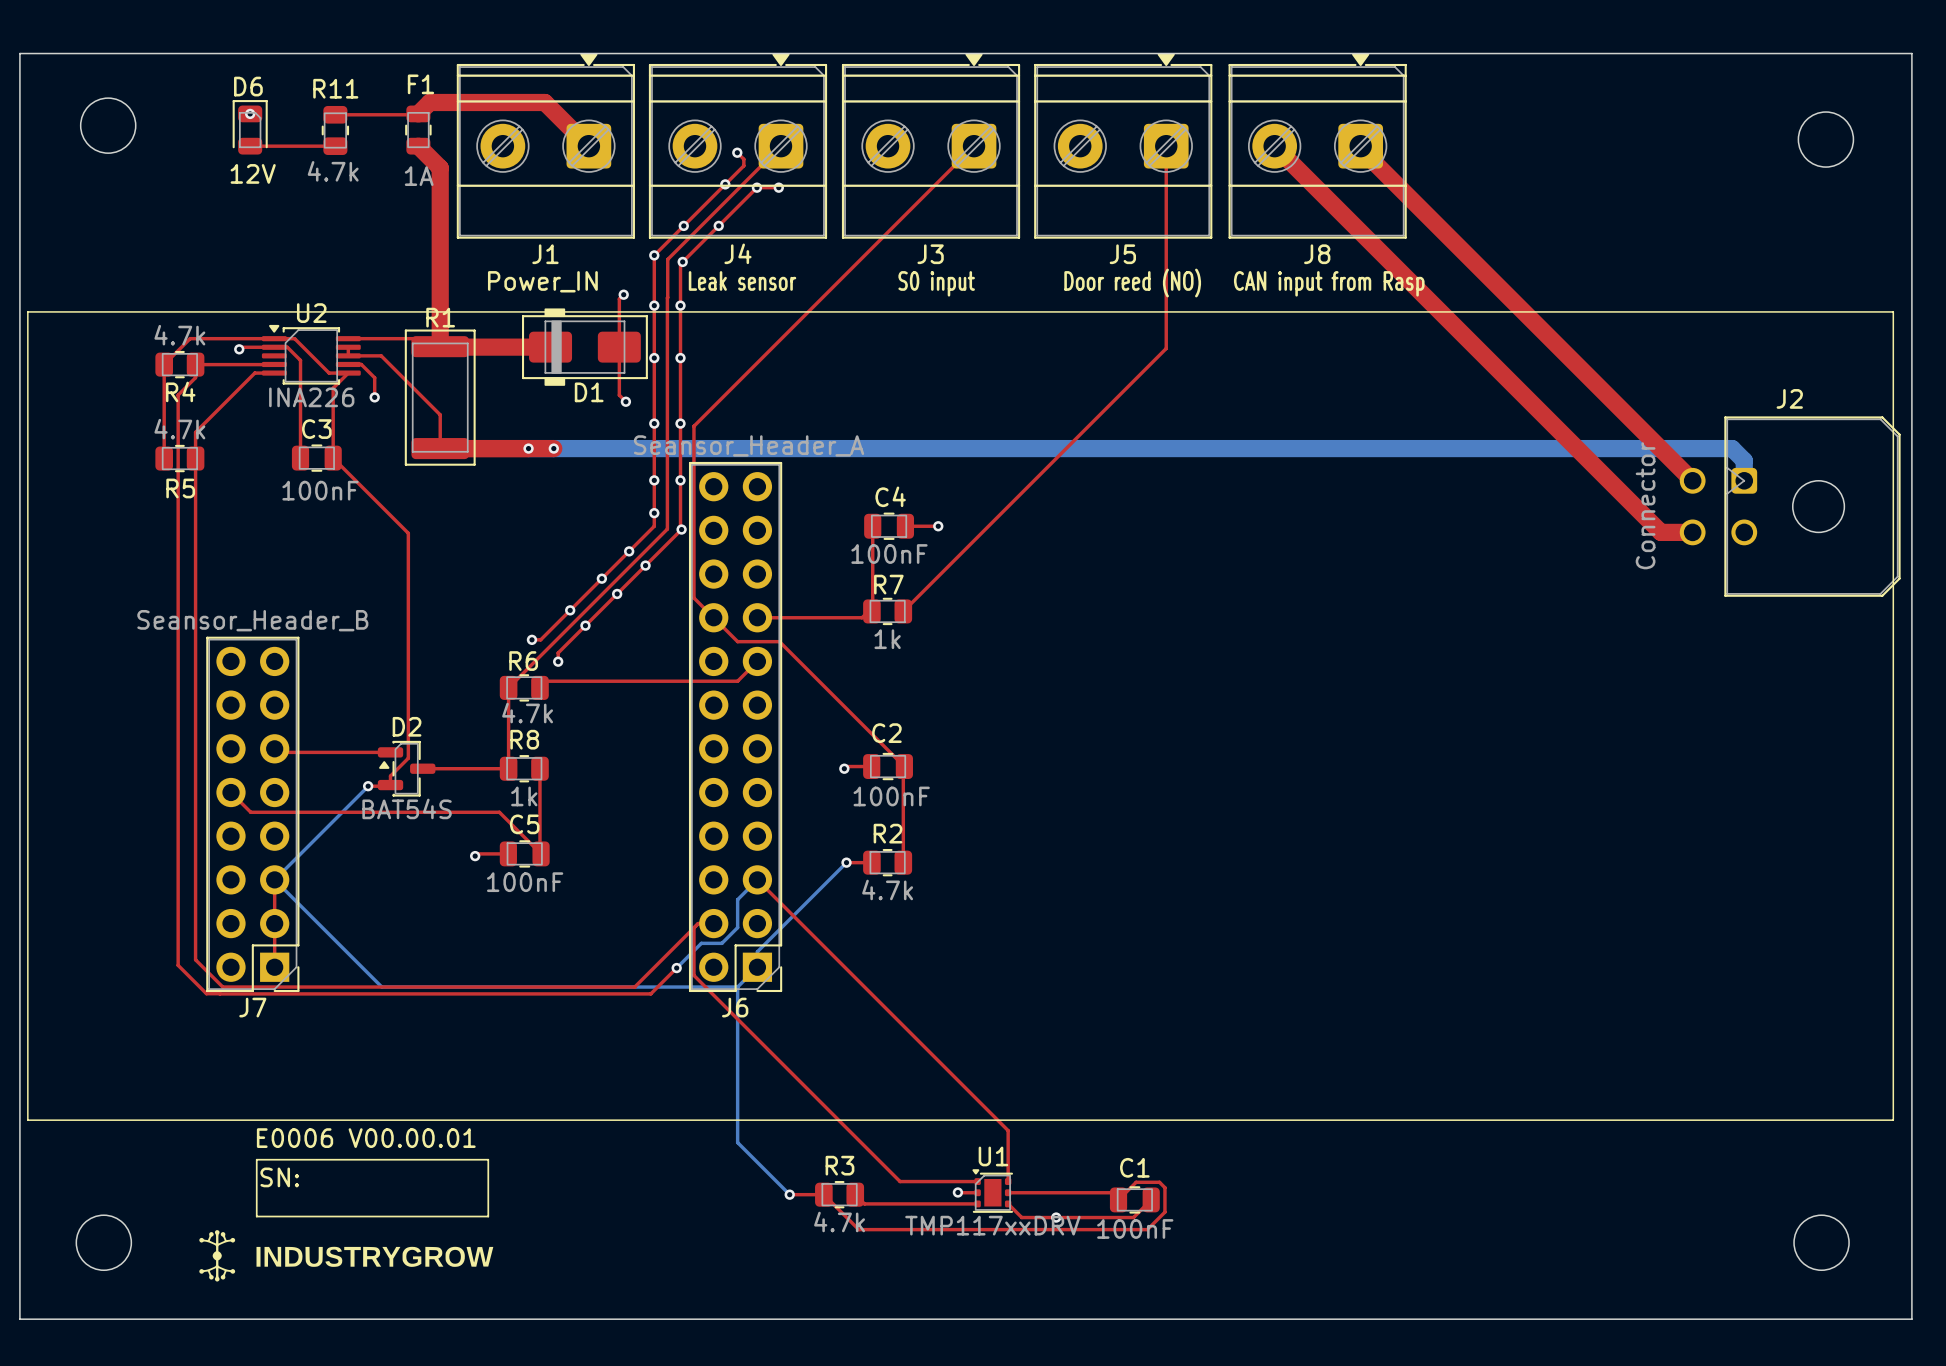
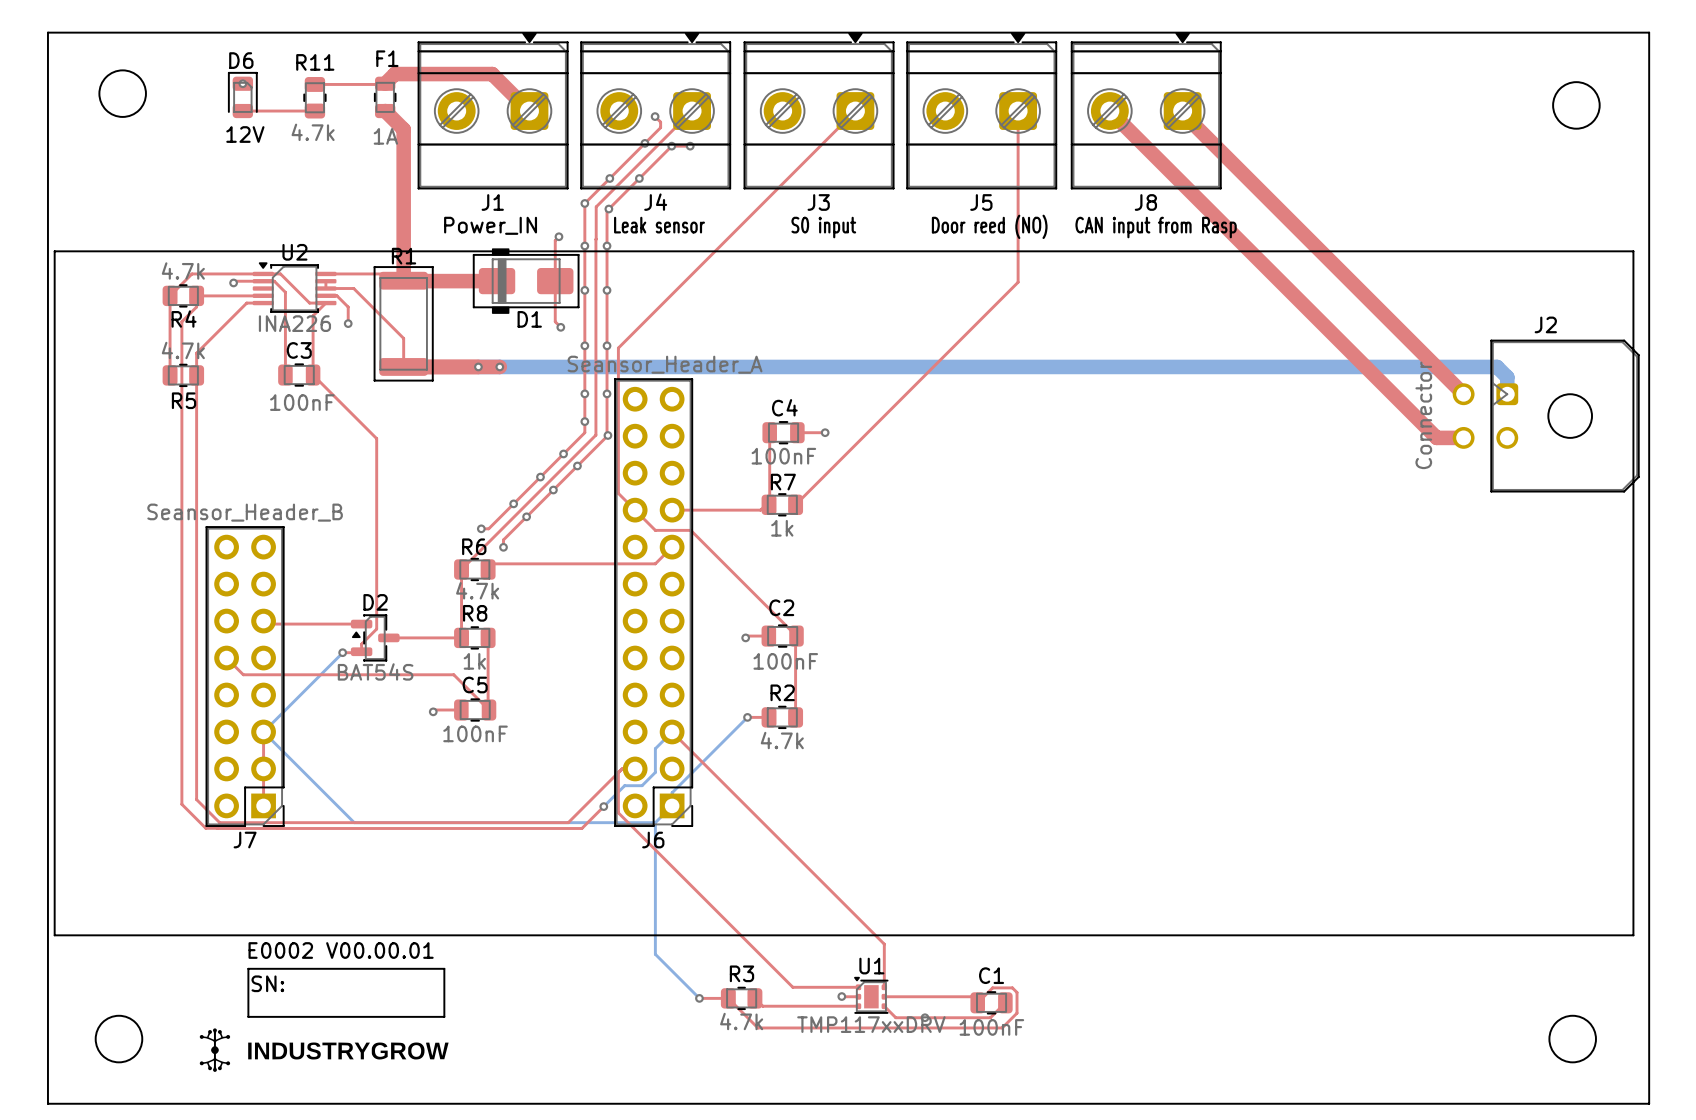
text: E0006 V00.00.01 (366, 1138) -> E0002 V00.00.01 (341, 950)

